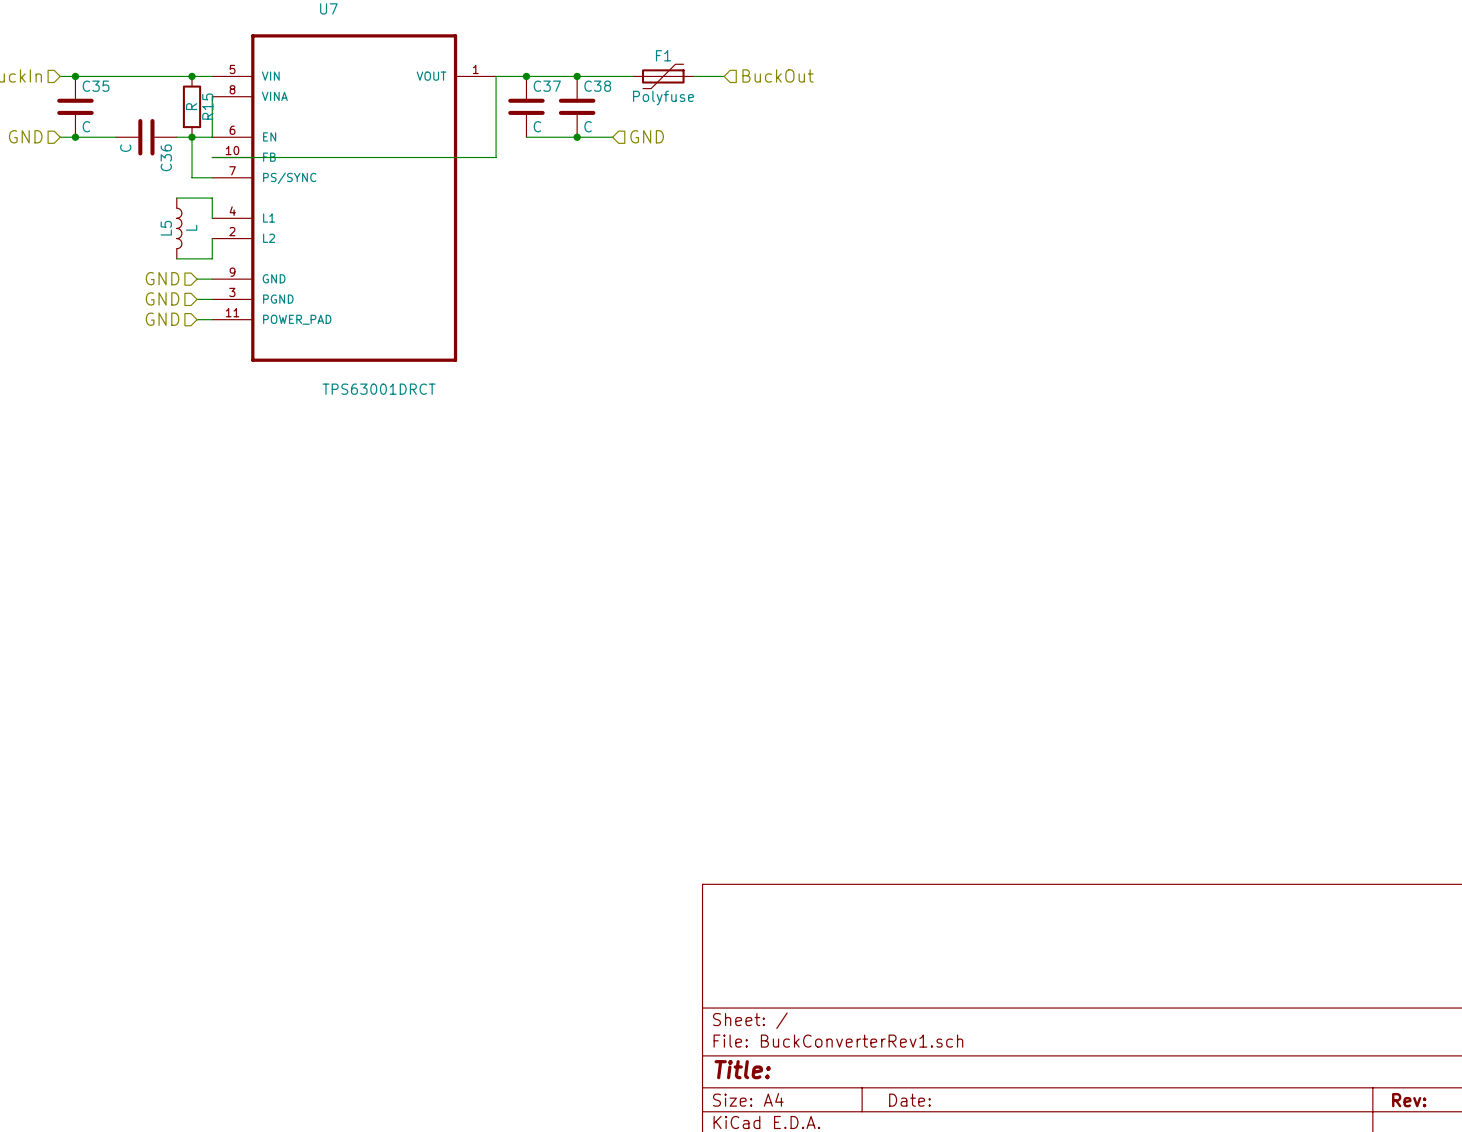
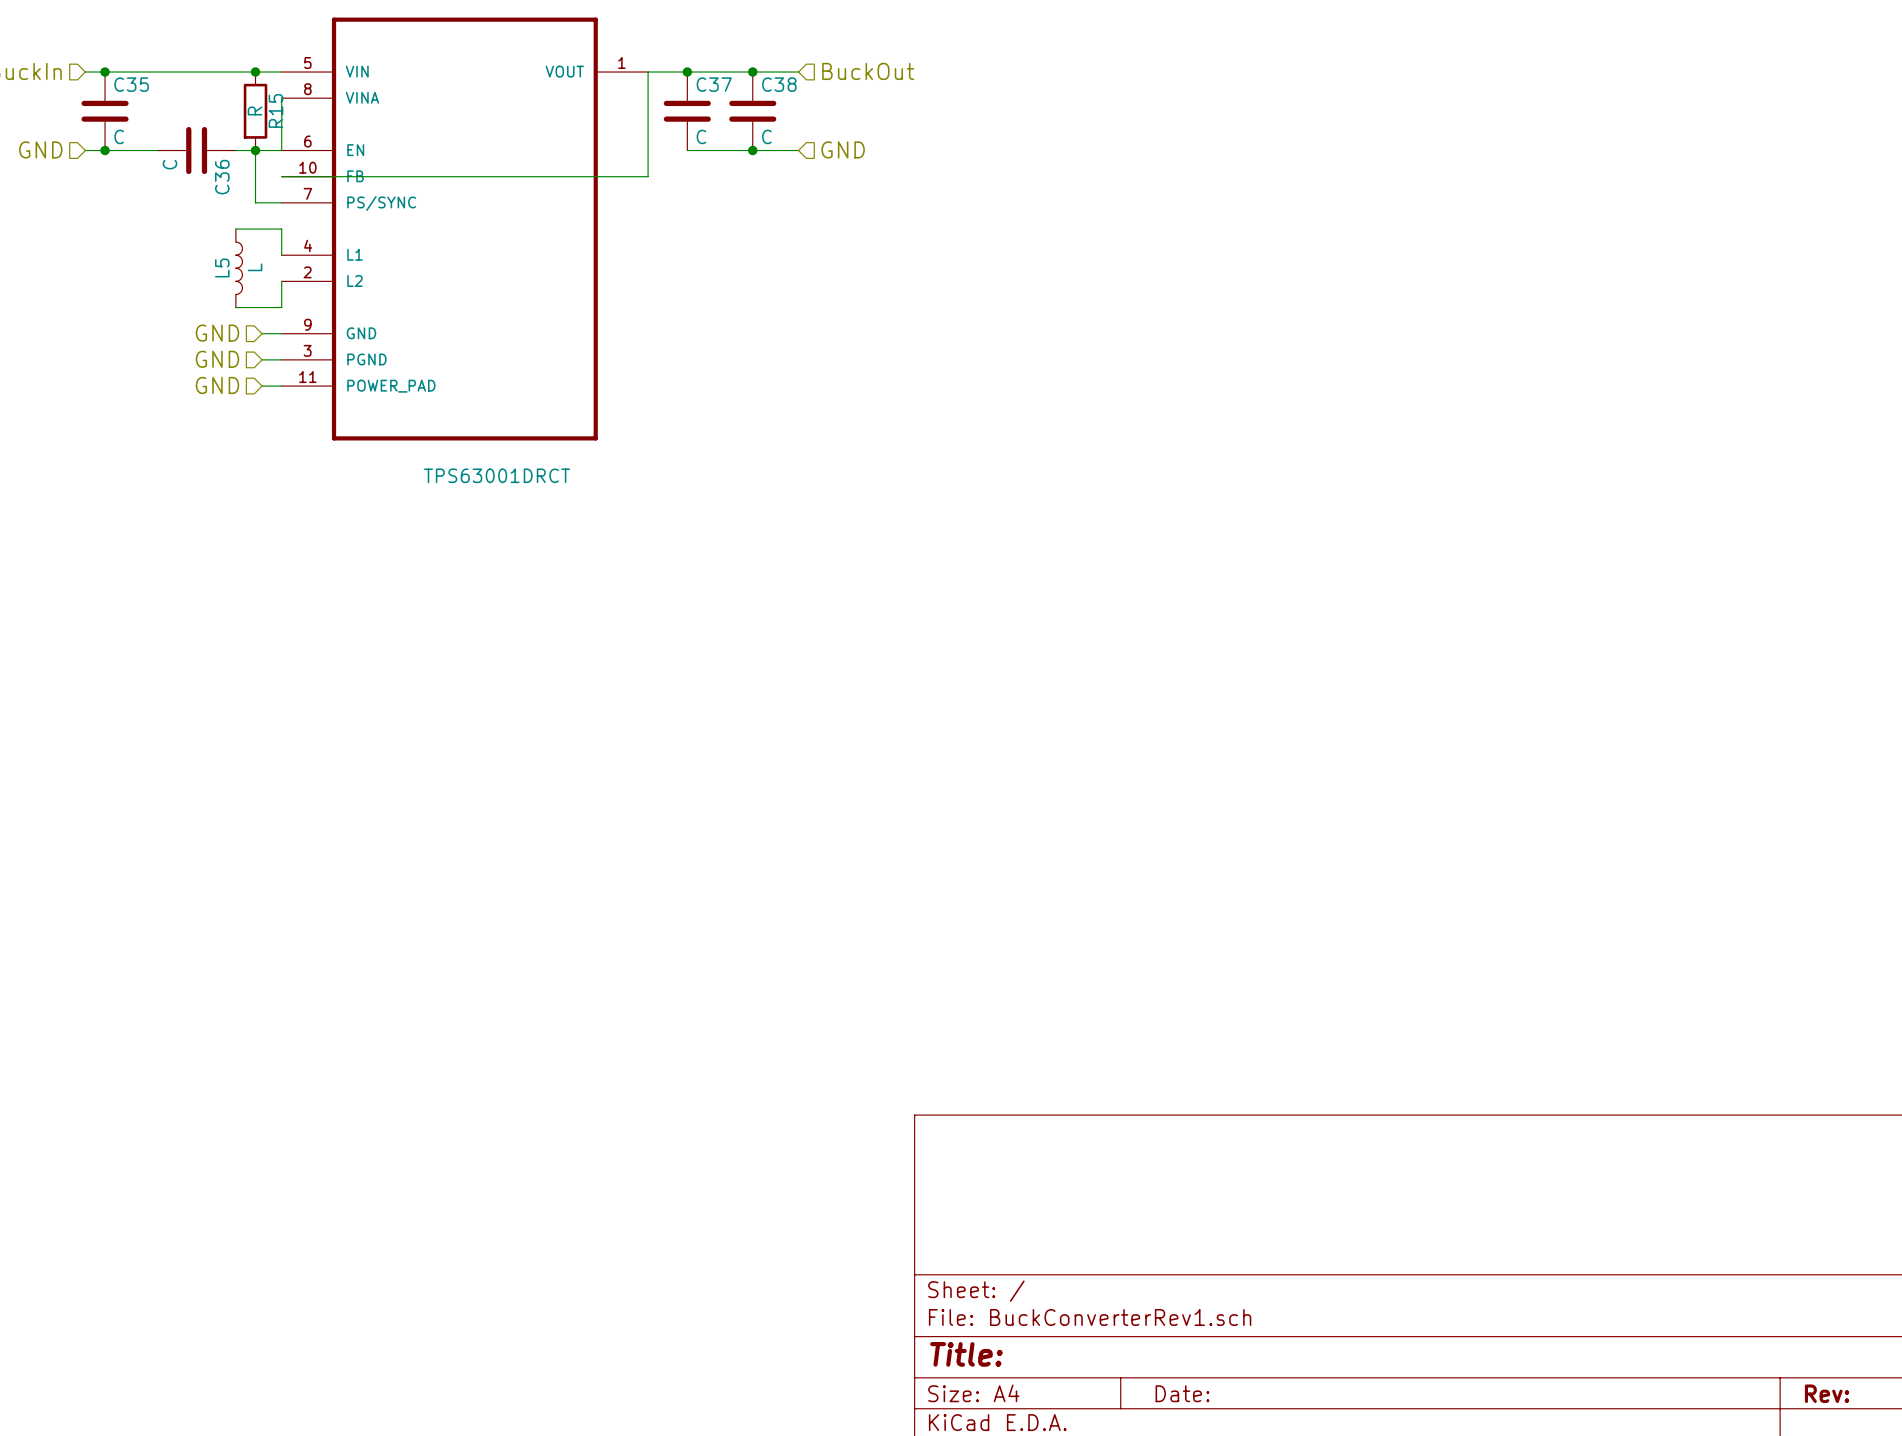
hierarchical label position: BuckOut (778, 75) -> BuckOut (868, 71)
wire: (612, 76) (632, 76) -> none
F1: Polyfuse (663, 76) -> none
wire: (693, 76) (724, 76) -> none

